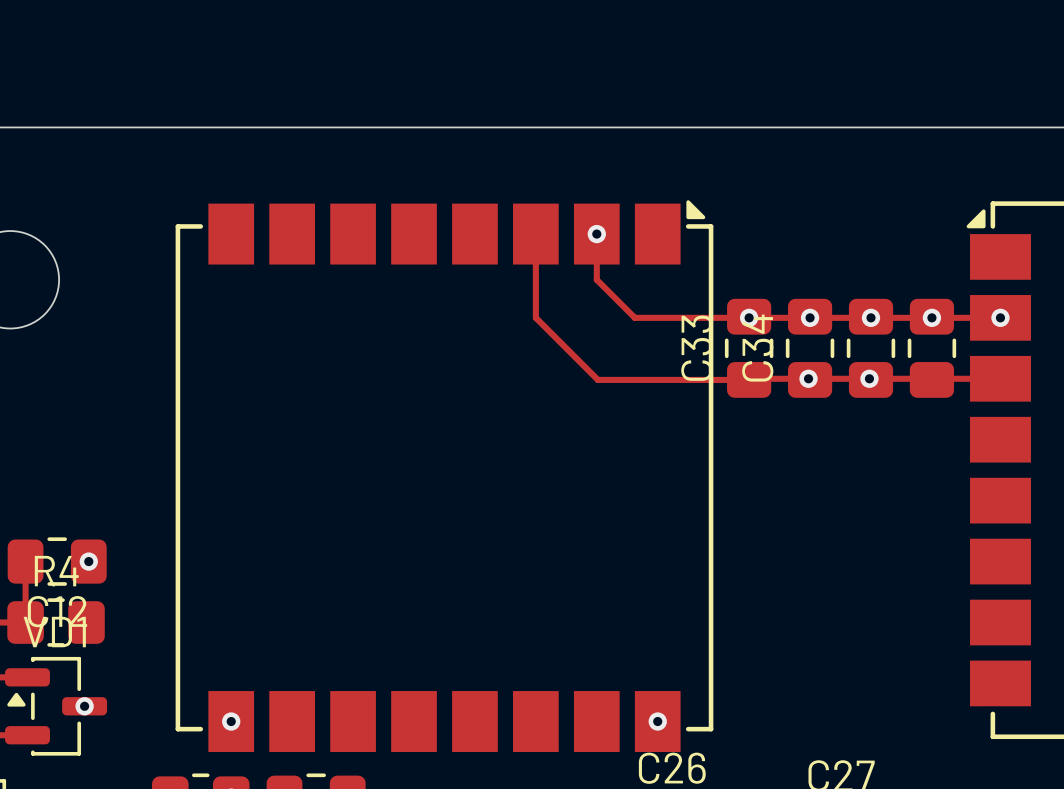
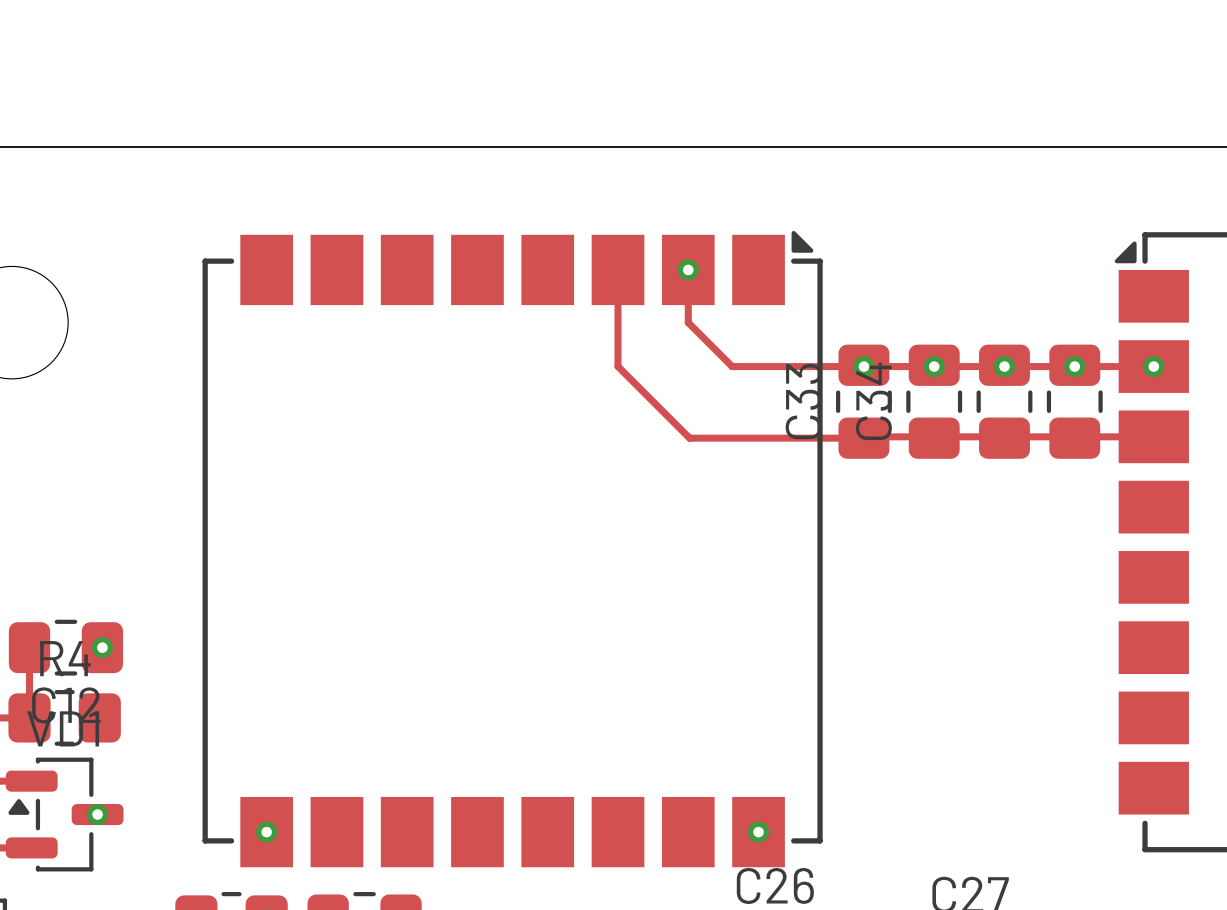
via: (808, 378) -> none
via: (869, 378) -> none

